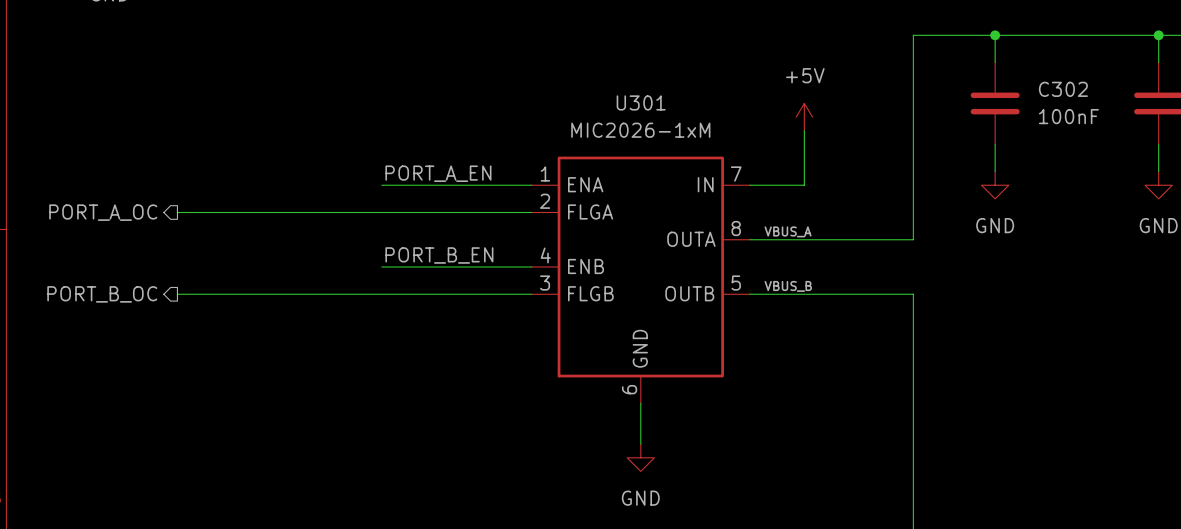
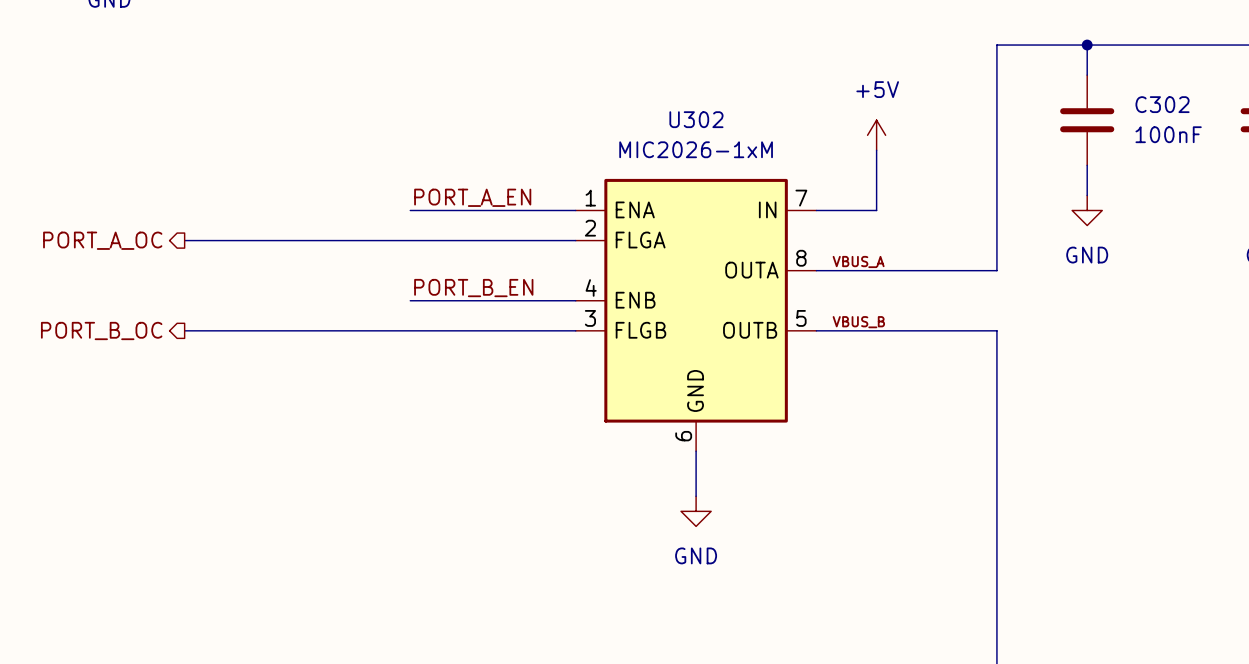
U301 name: U301 (641, 102) -> U302 (696, 119)

